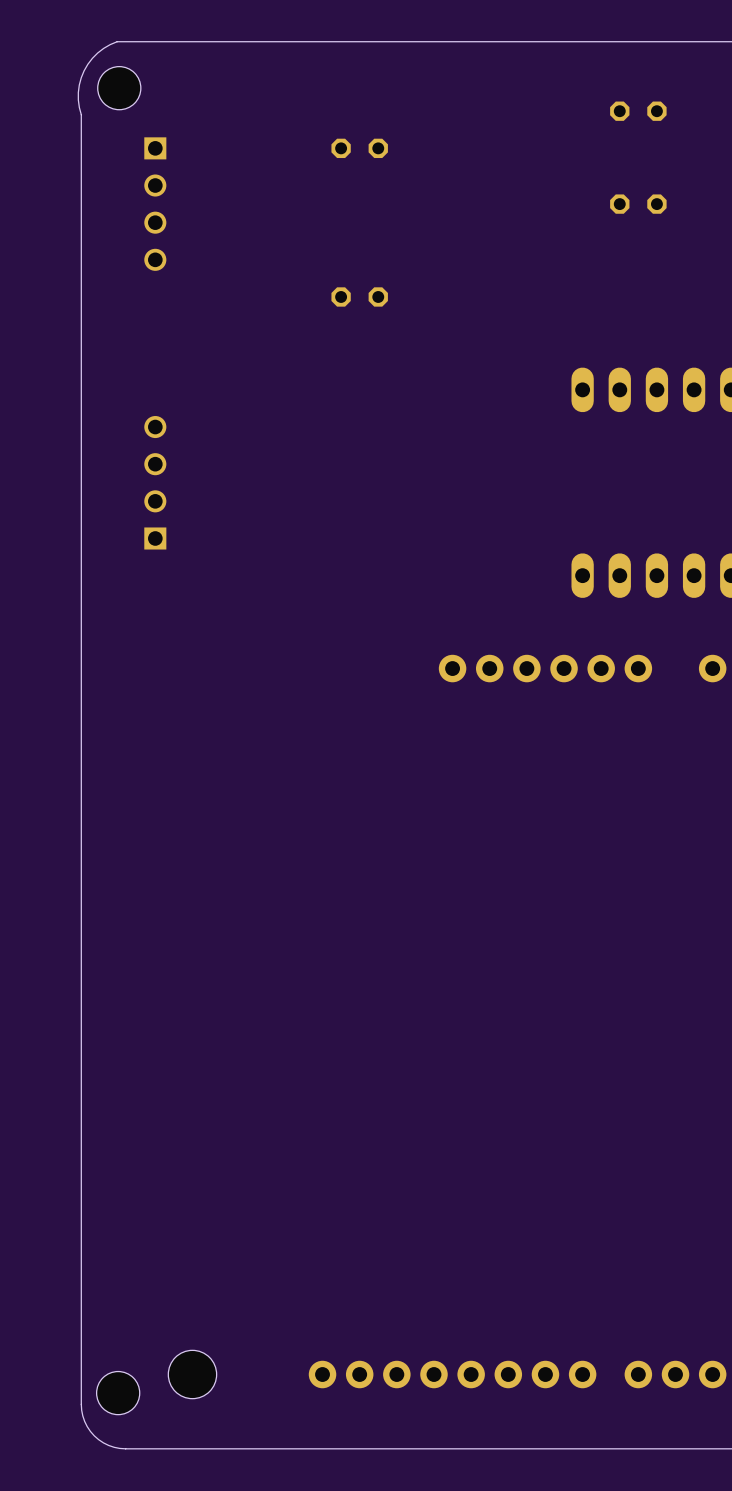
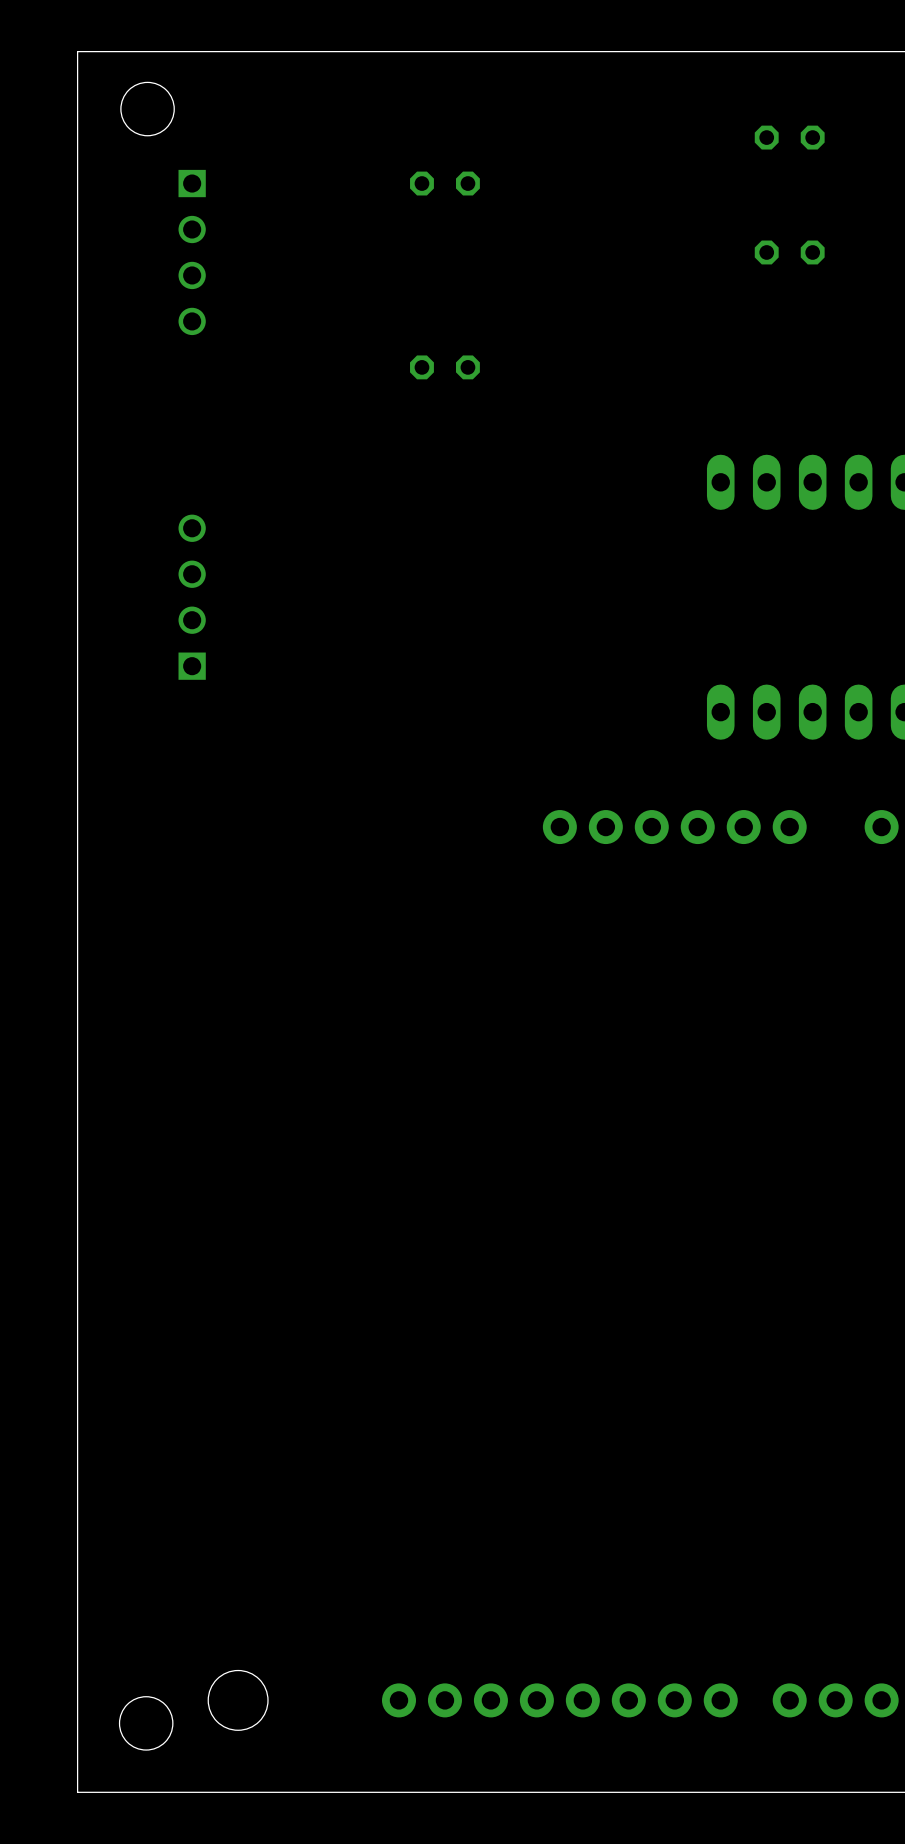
board edge: (117, 41) (103, 48) (92, 58) (81, 77) (78, 92) (81, 114) (81, 1404) (84, 1421) (94, 1435) (108, 1445) (125, 1448) -> (144, 51) (77, 51) (77, 1792) (155, 1792)

